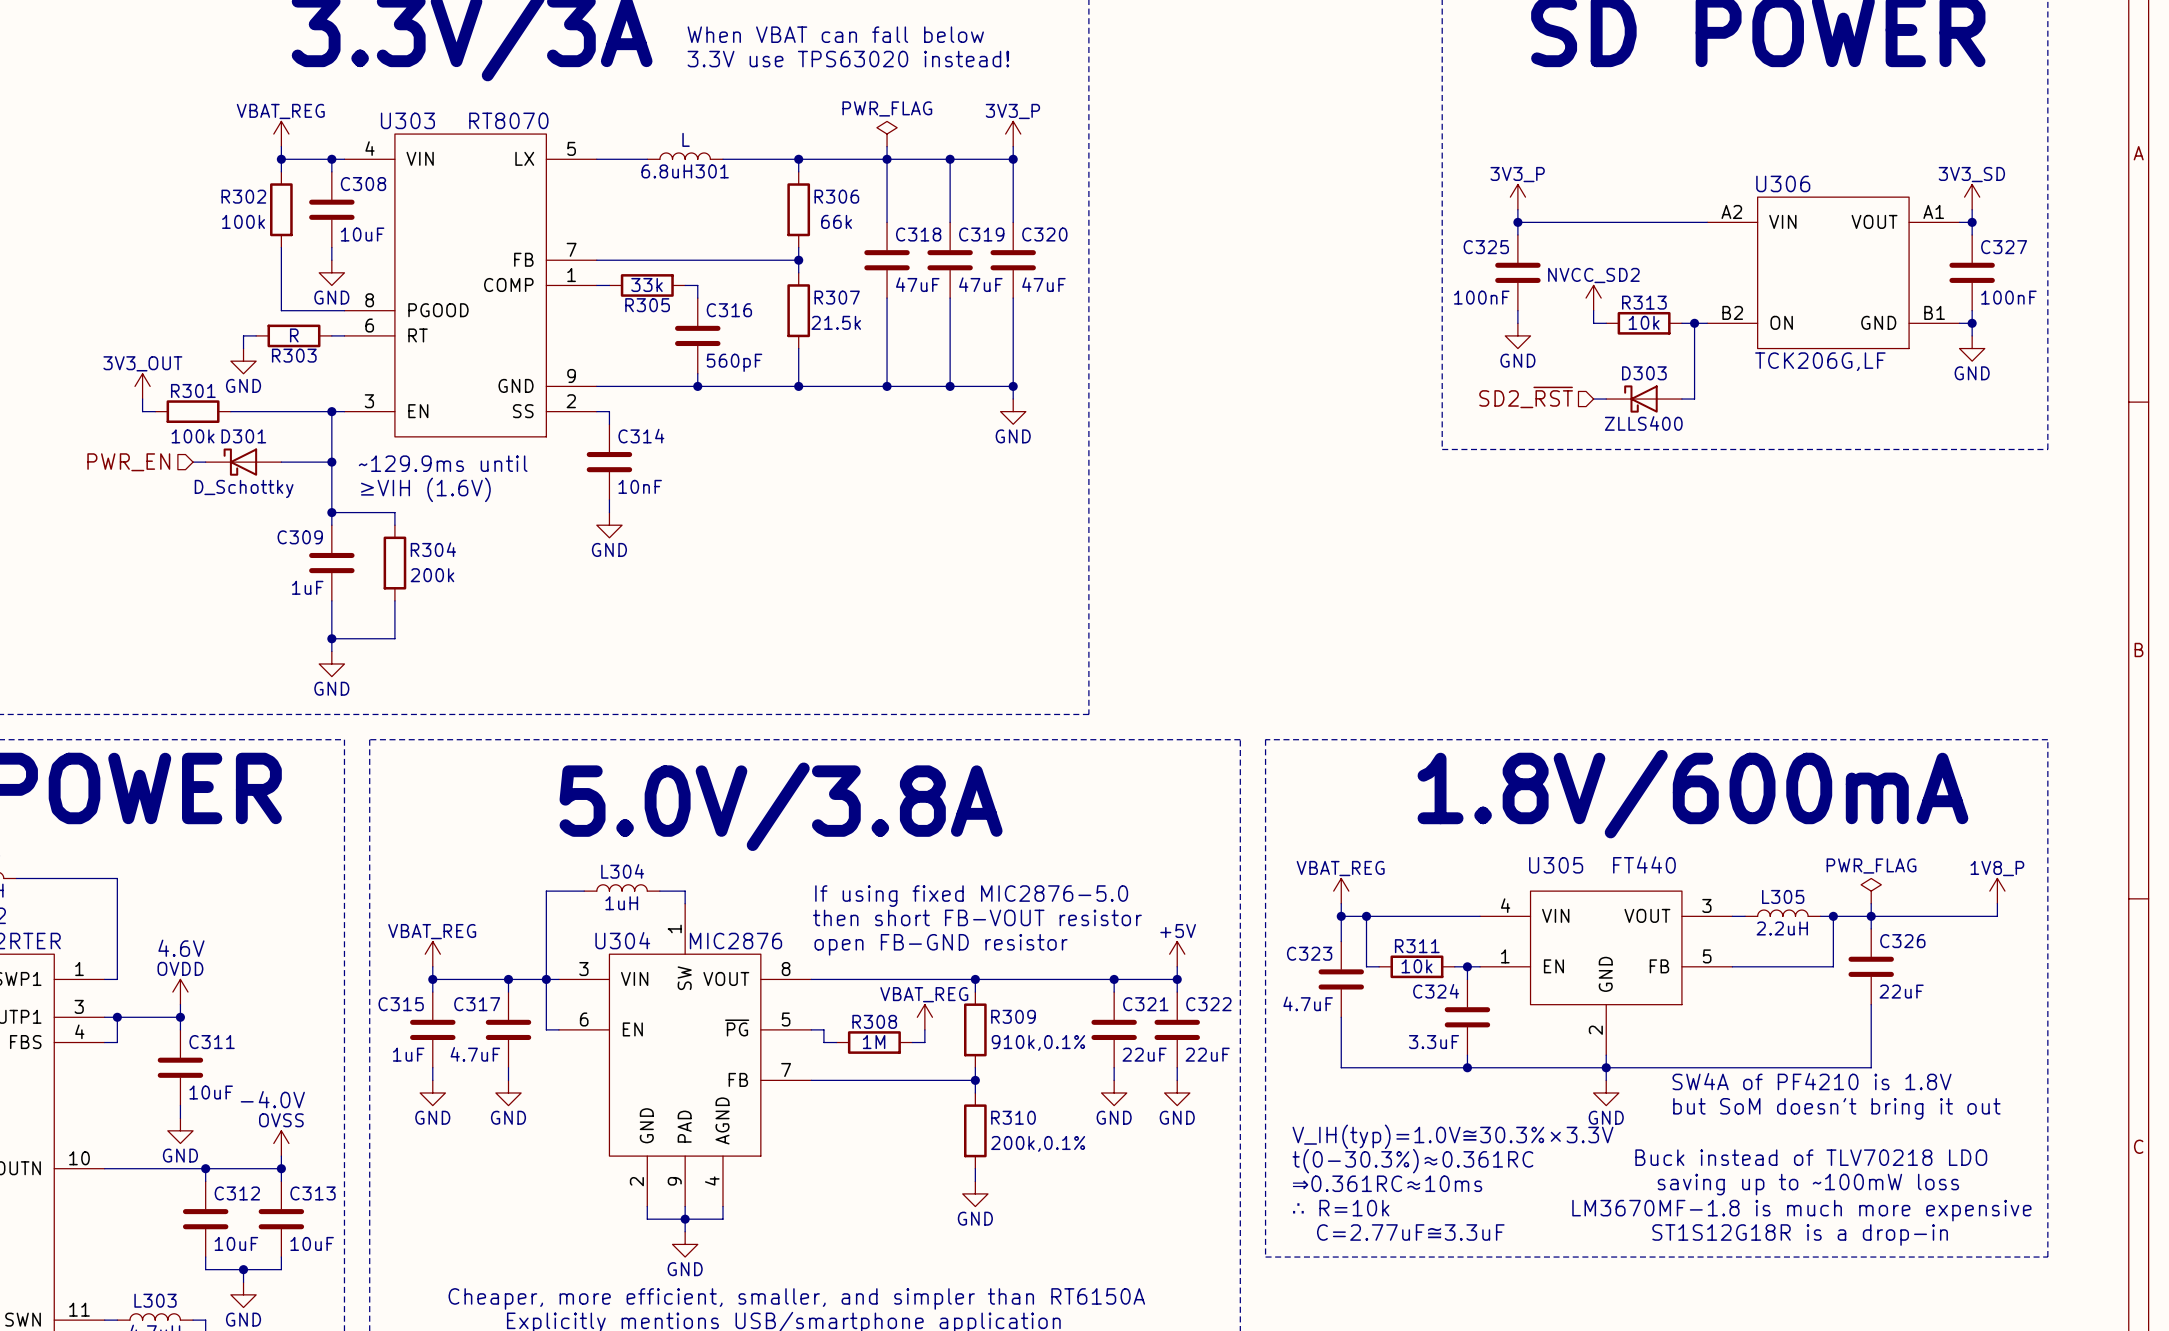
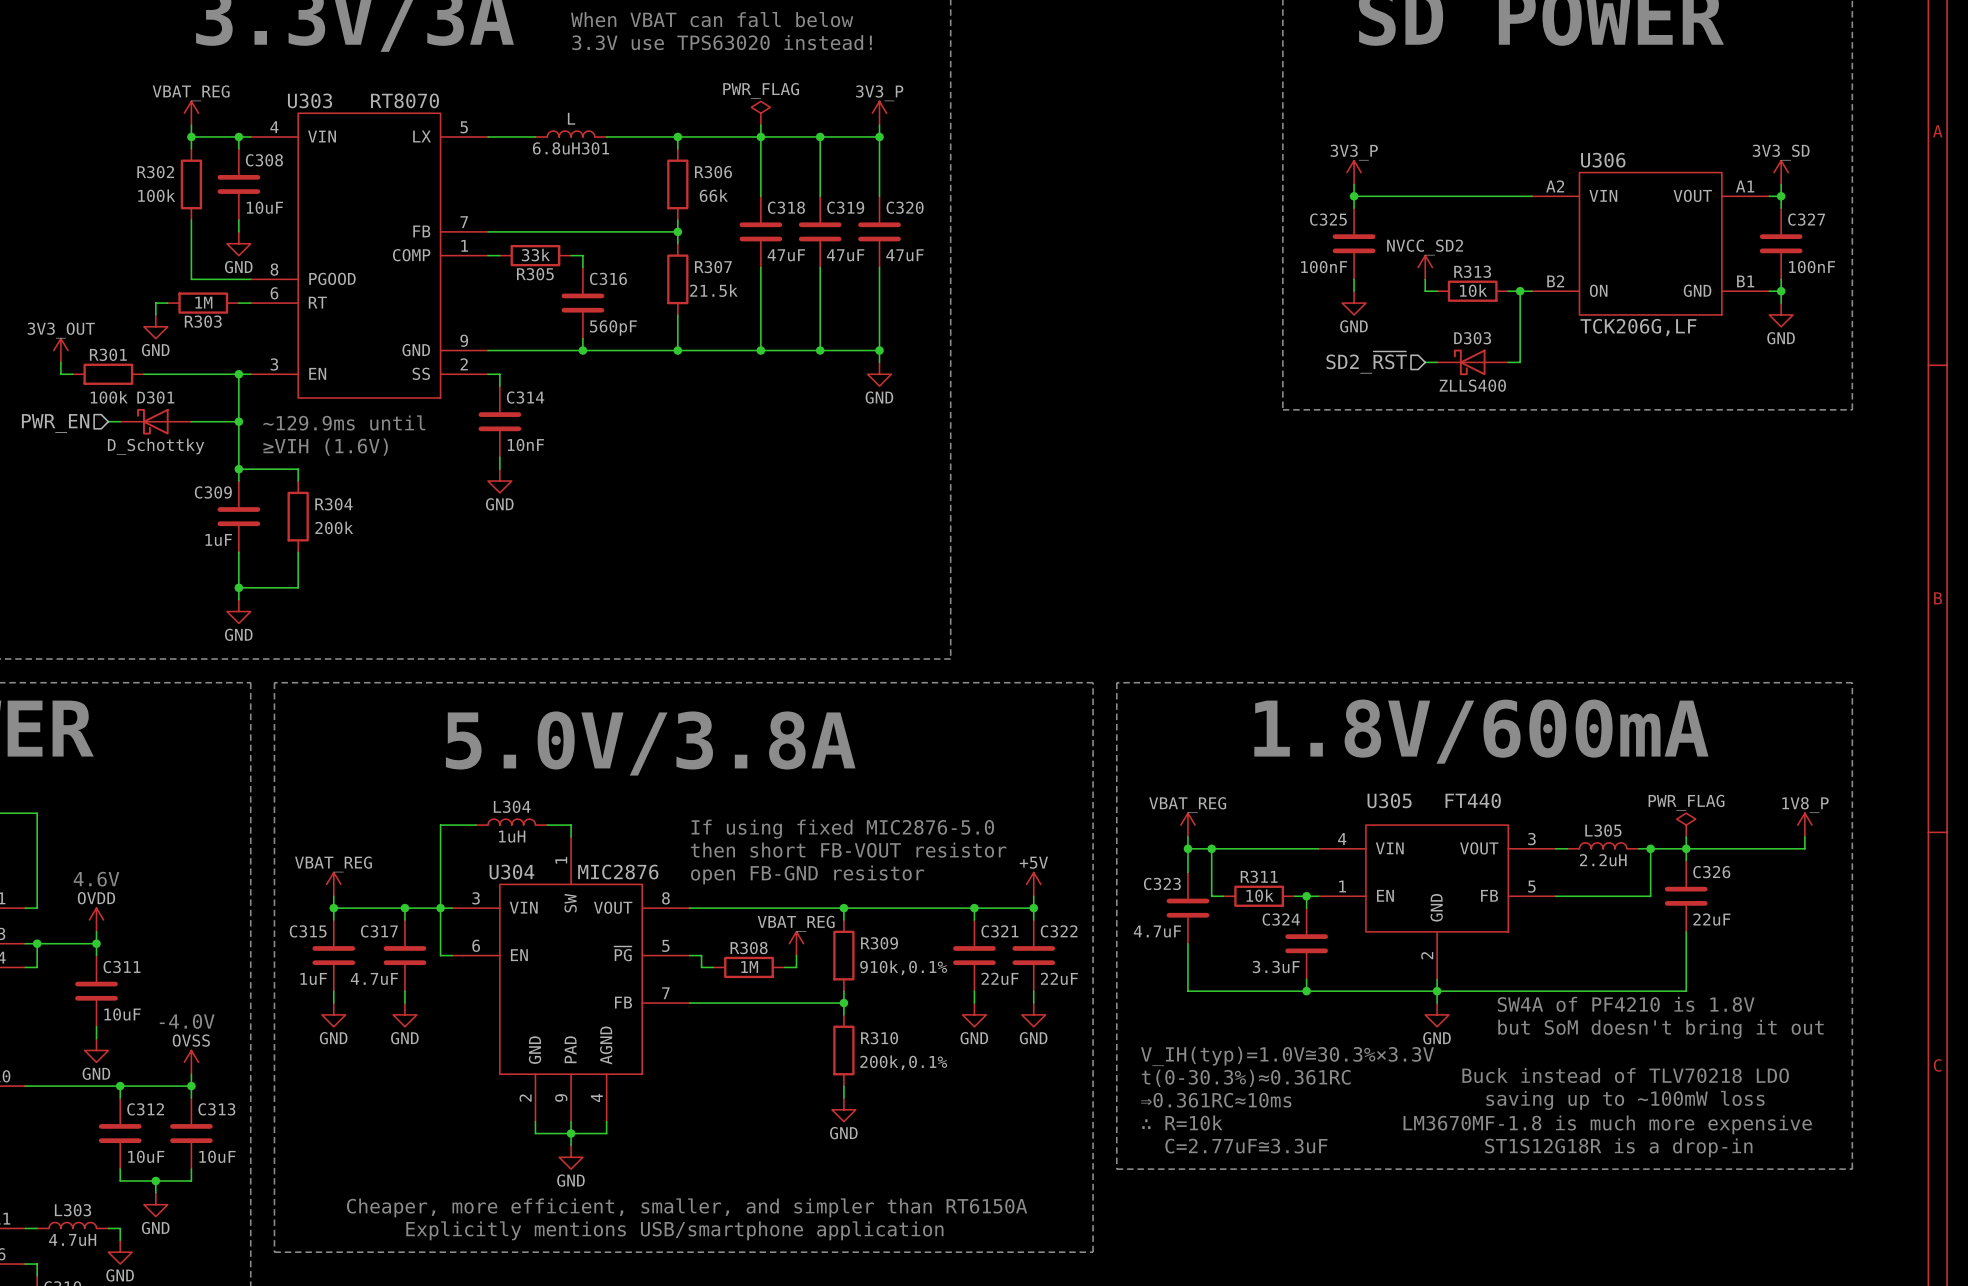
R303 value: R (294, 335) -> 1M (203, 302)

